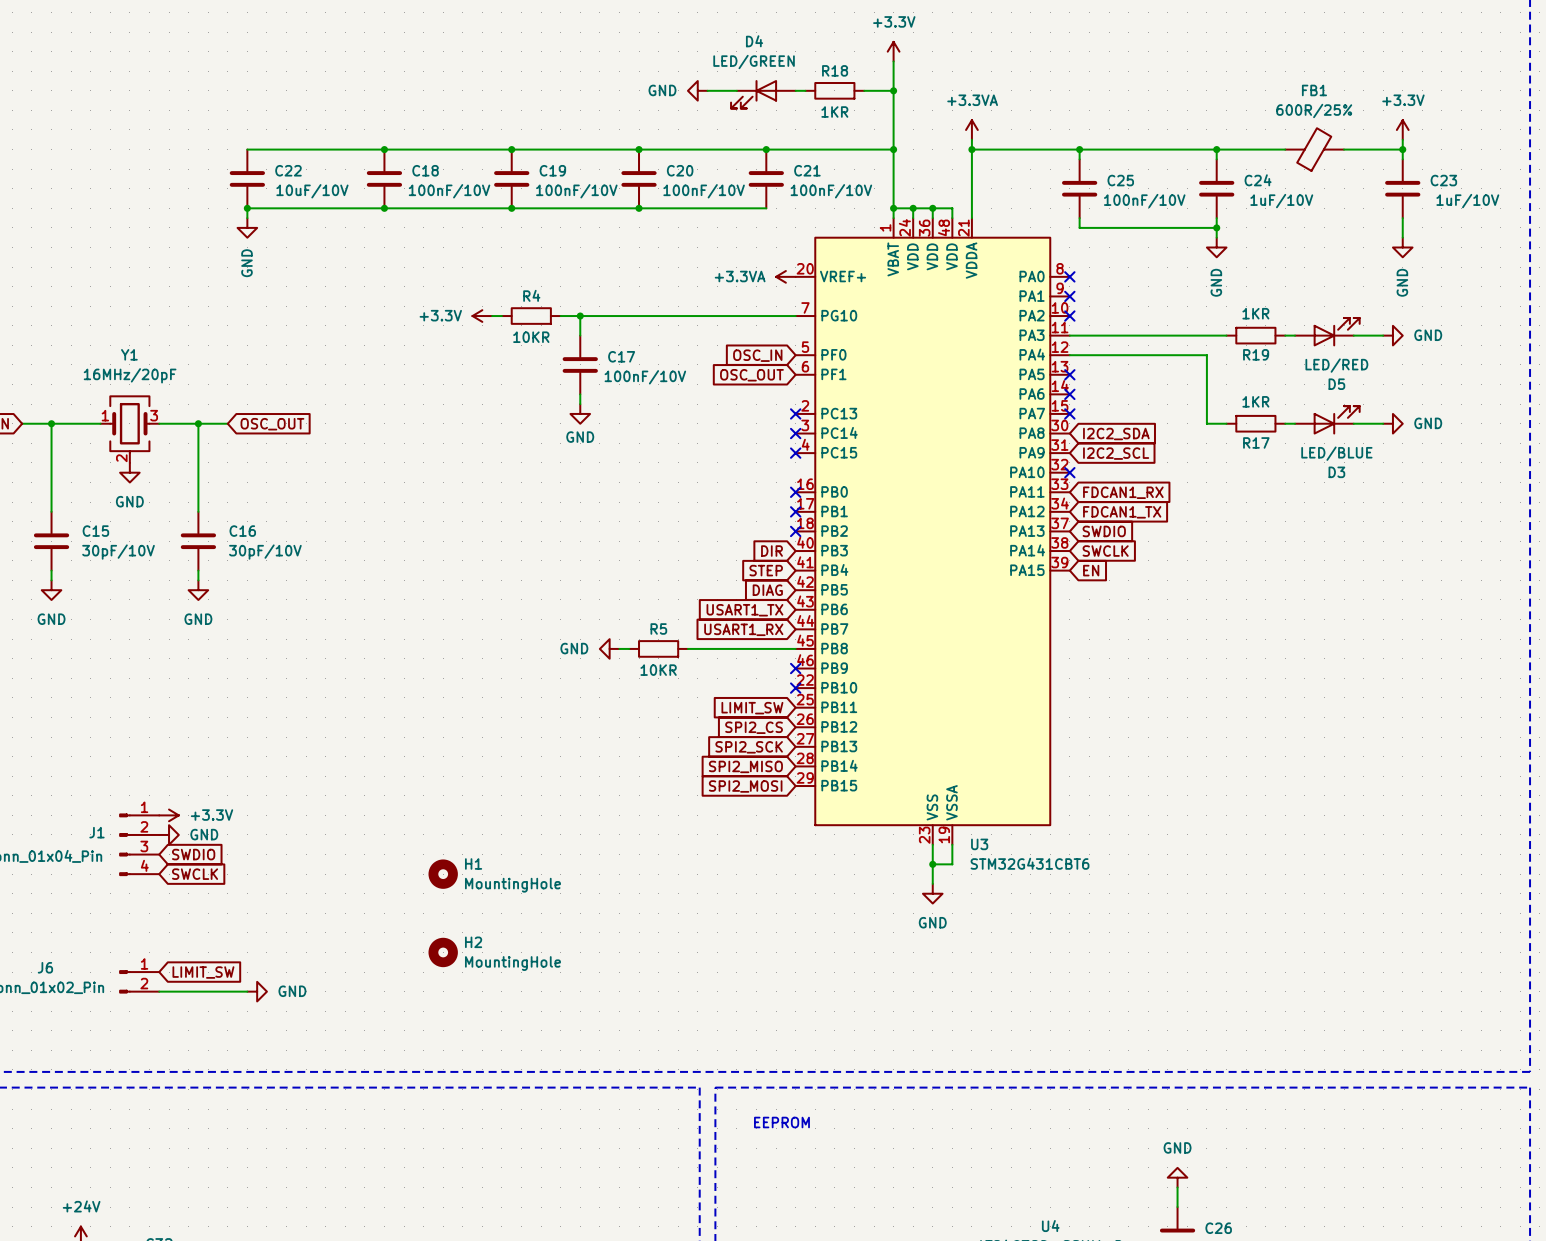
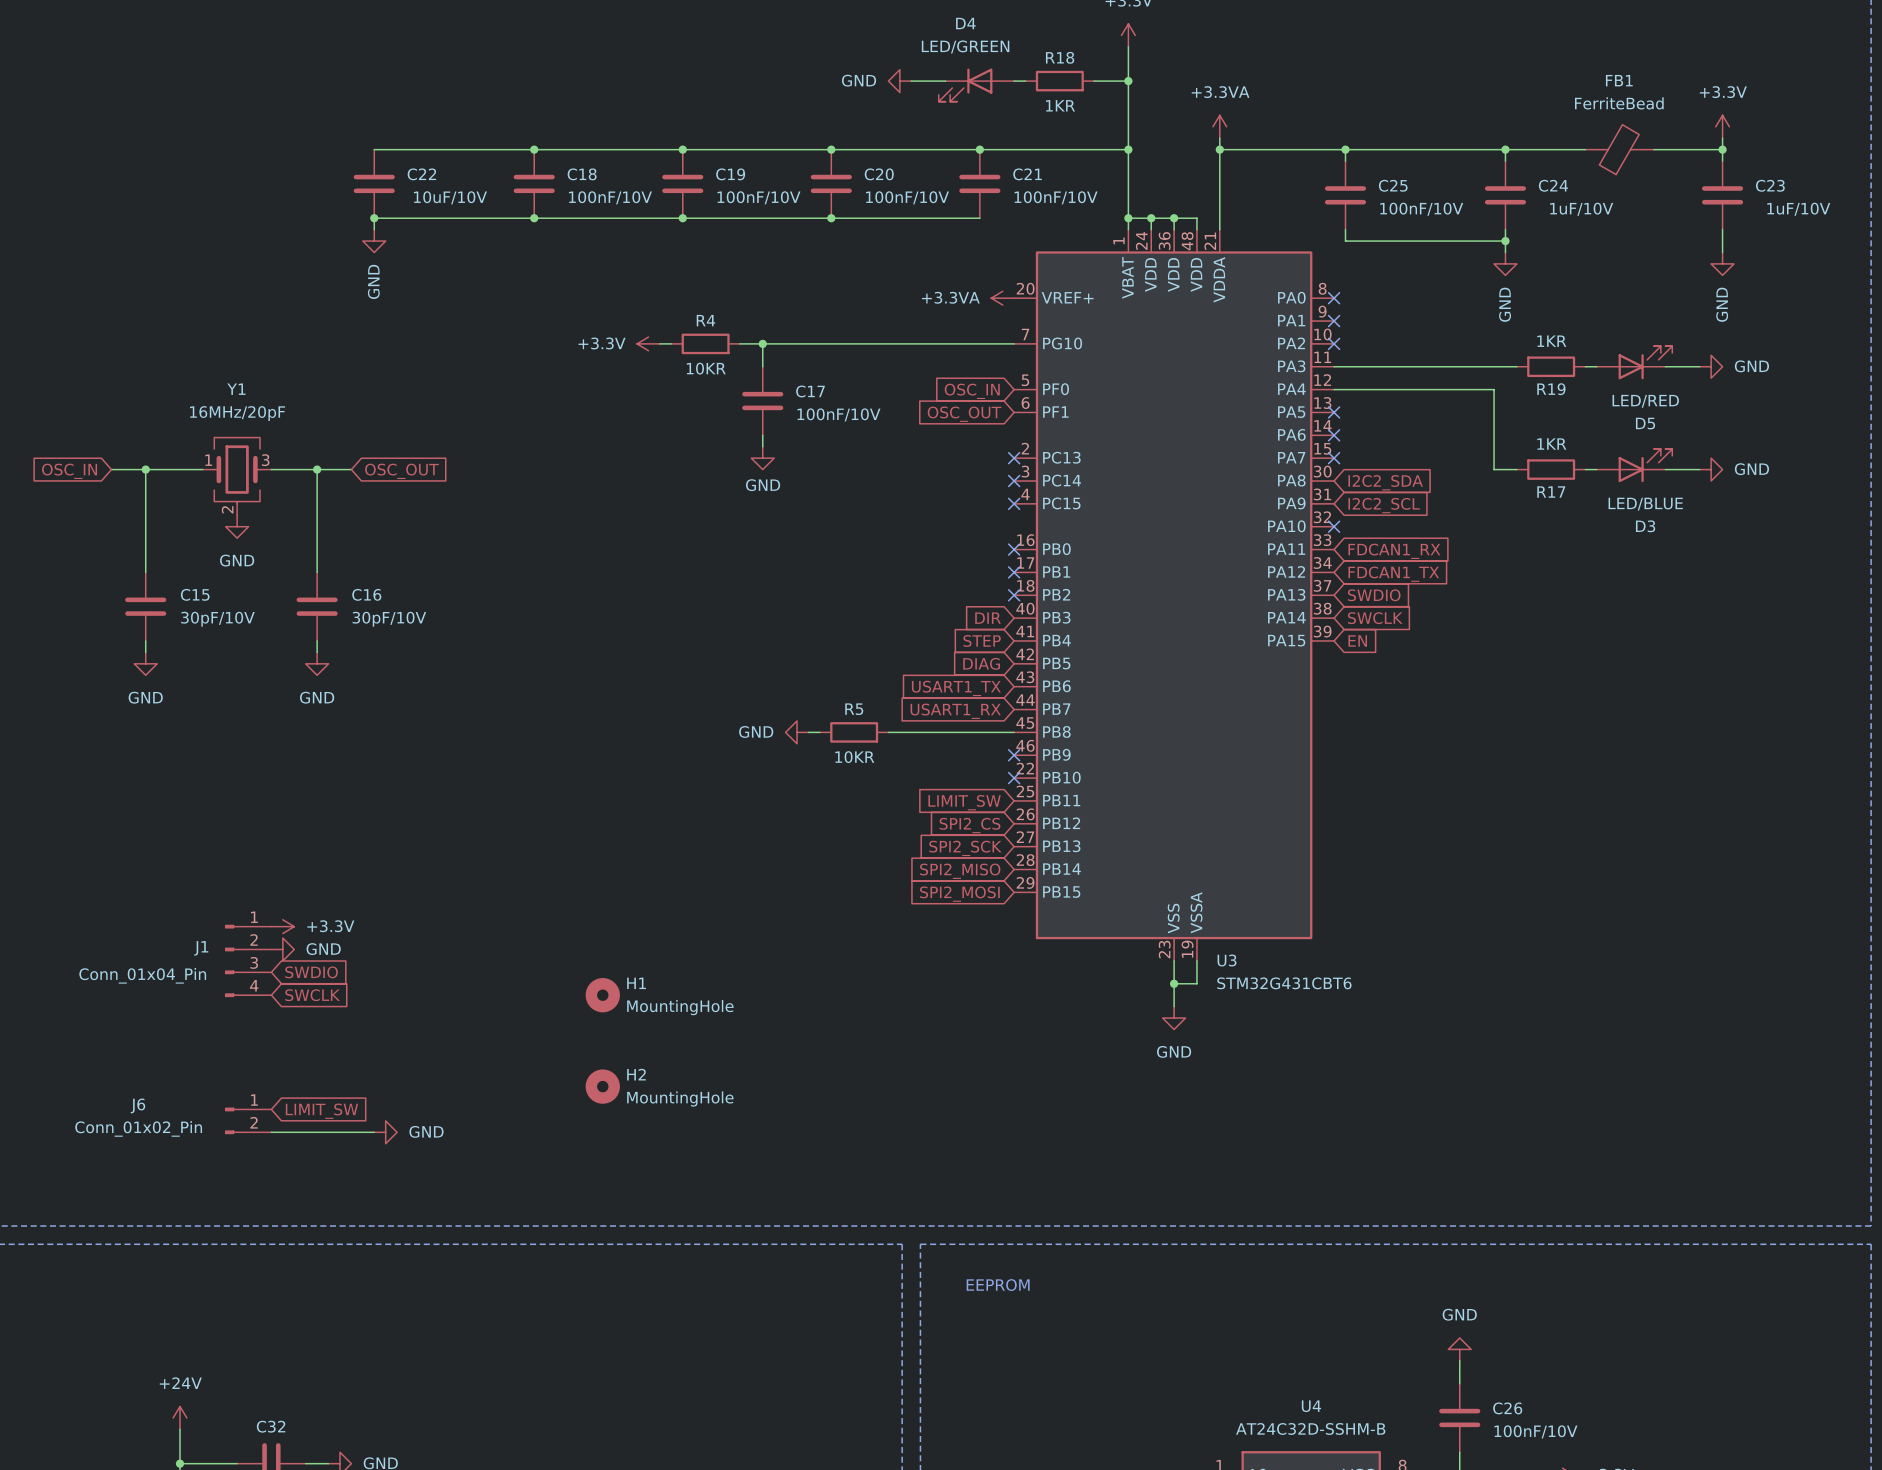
FB1 value: 600R/25% (1314, 110) -> FerriteBead (1619, 103)

